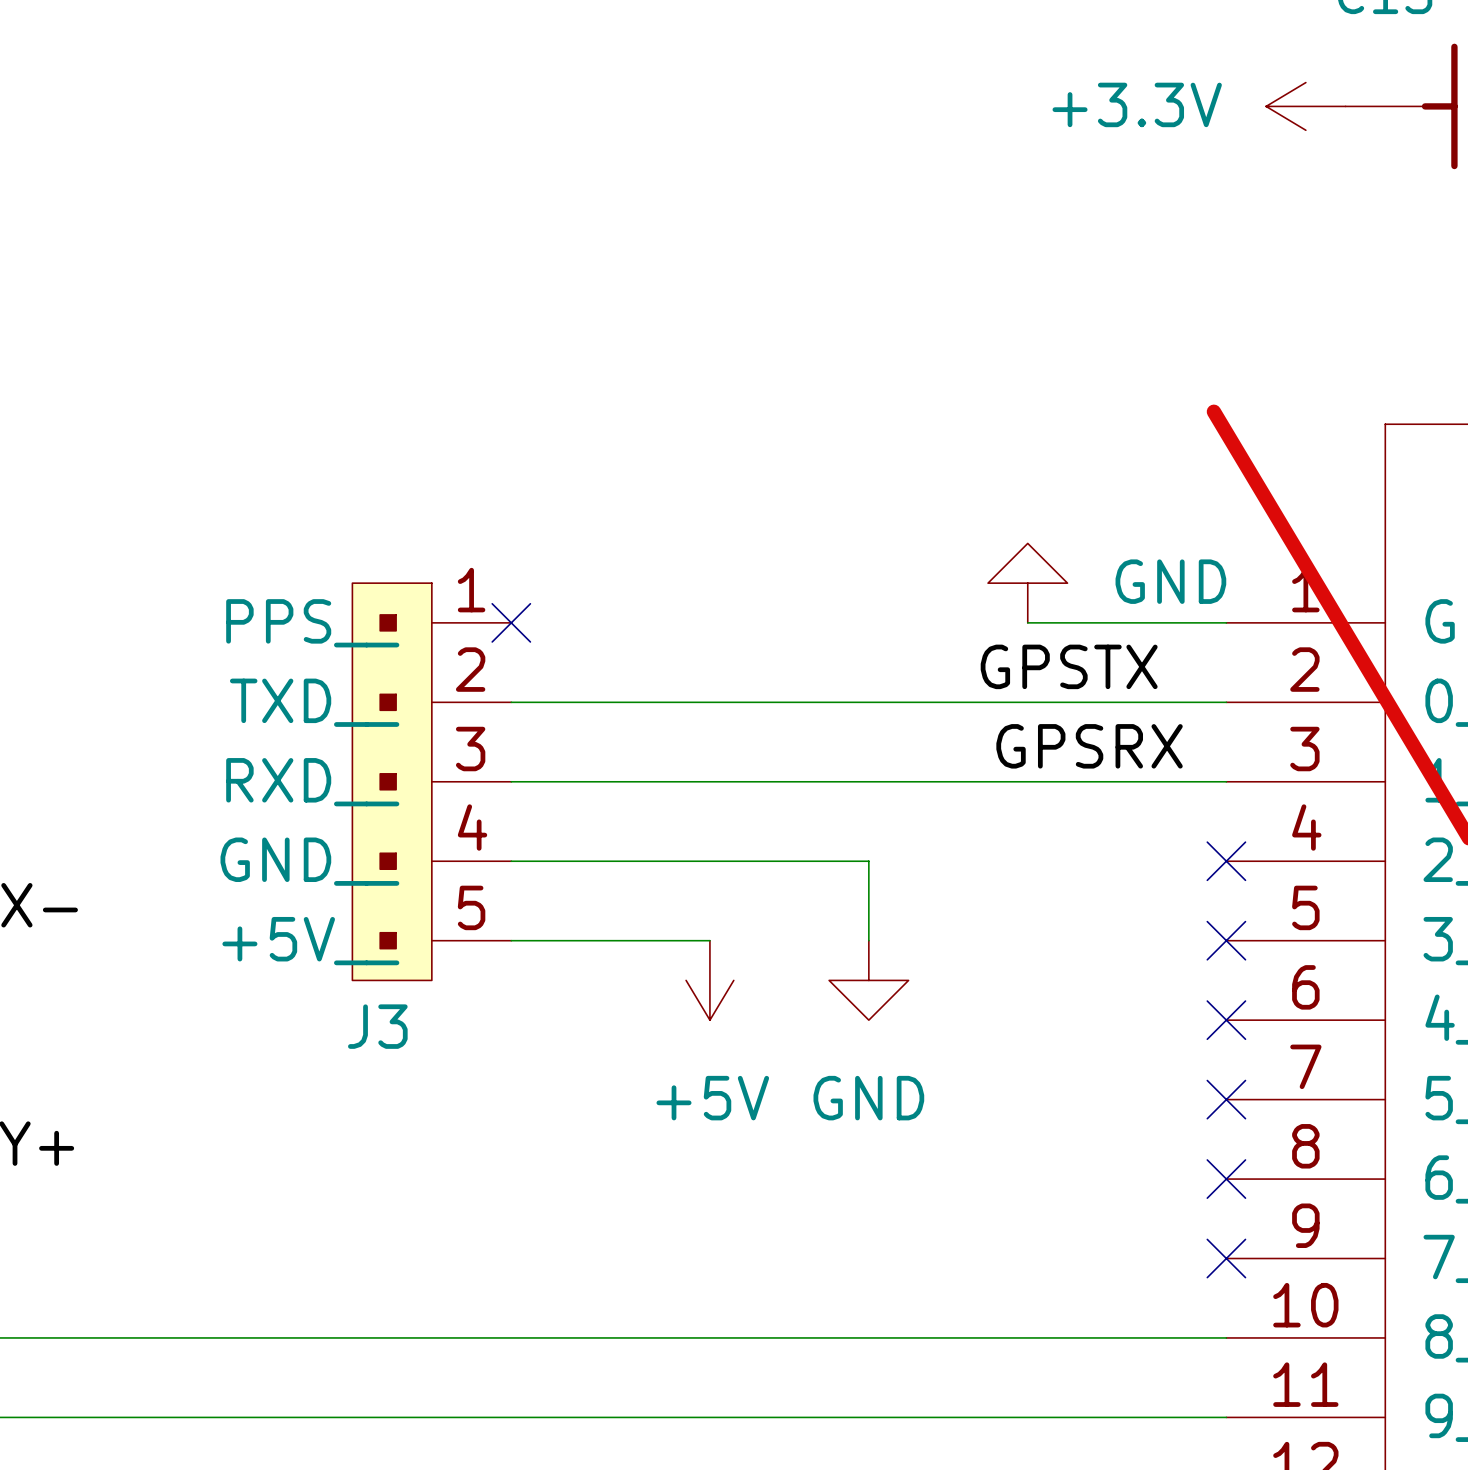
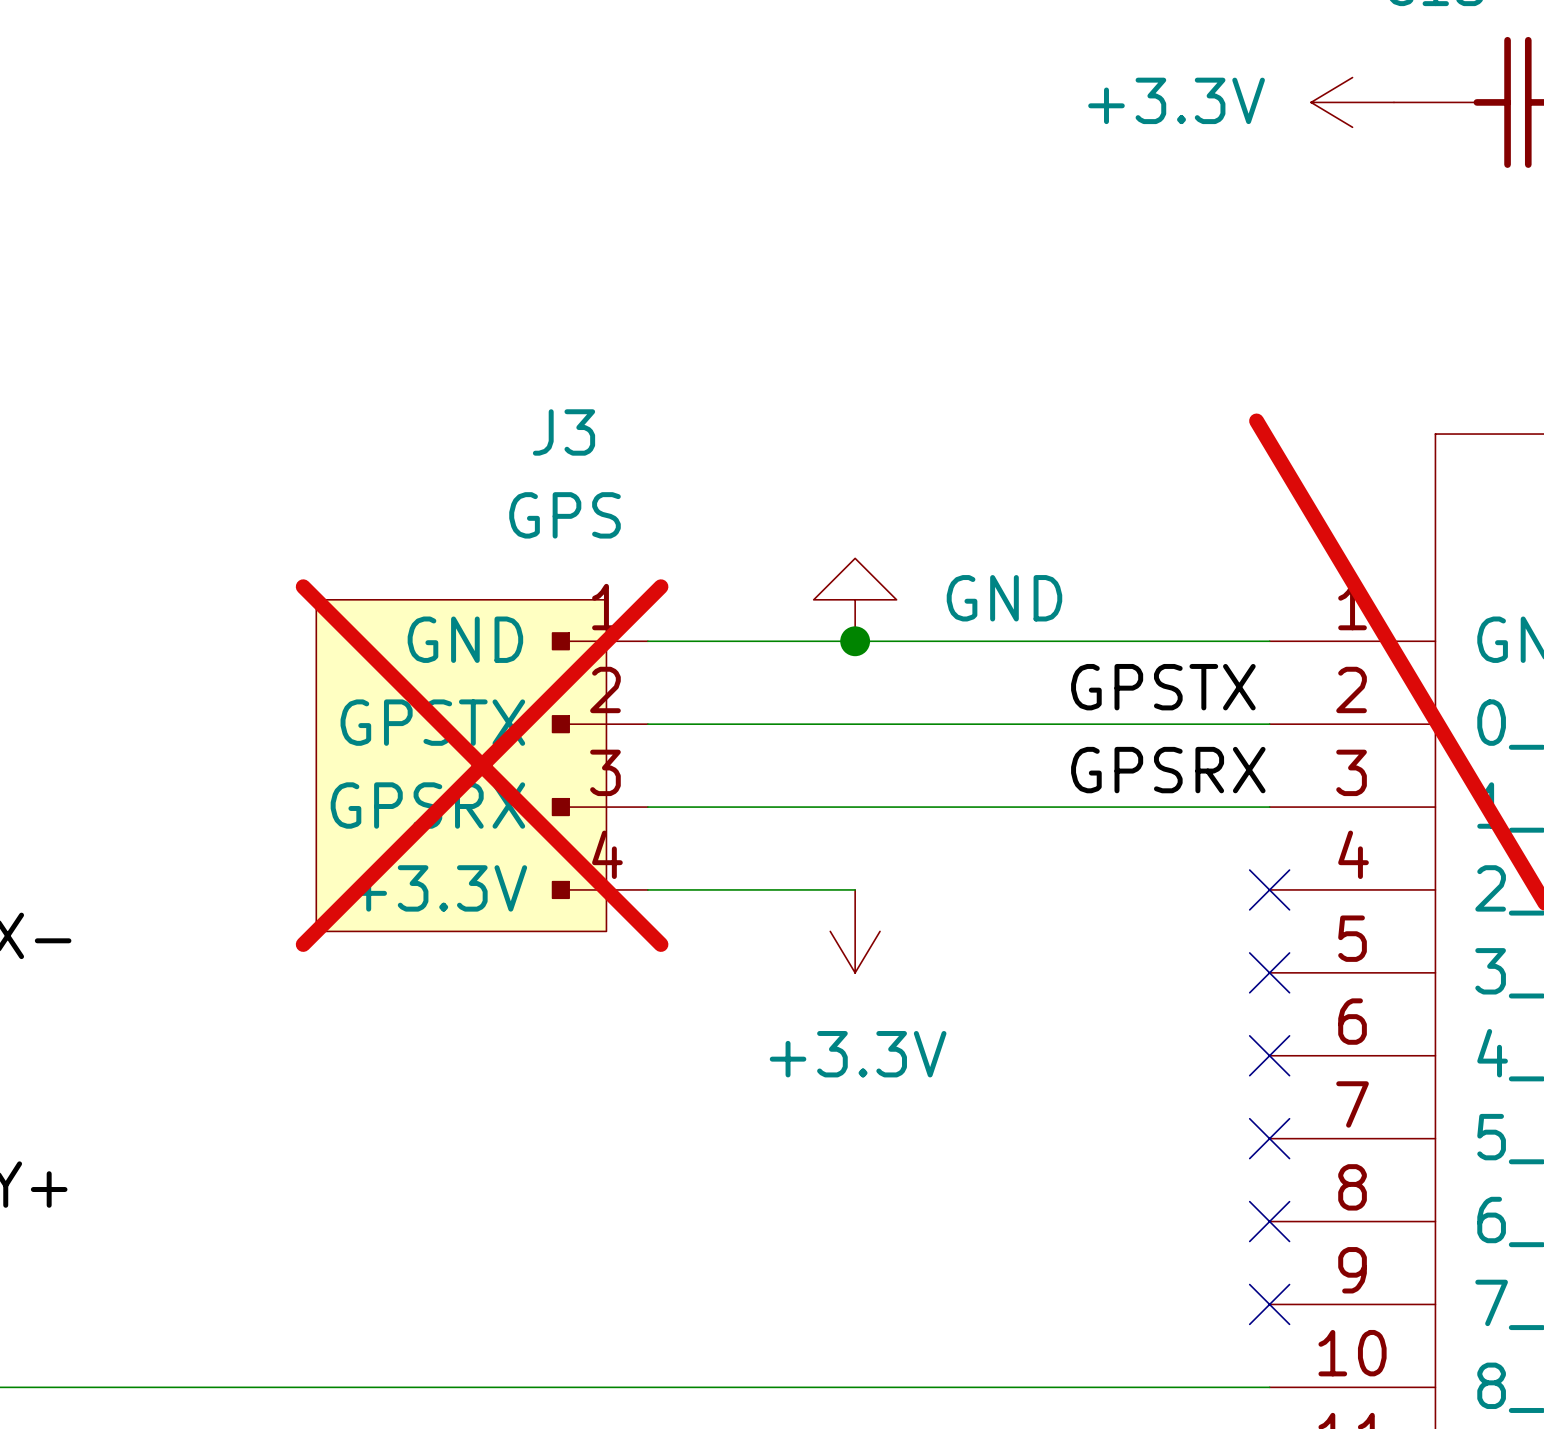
J3 value: none -> GPS (565, 515)
J3 symbol: [352, 583, 512, 981] -> [316, 599, 648, 932]
power symbol position: GND (1027, 583) -> GND (855, 599)
no-connect mark: (511, 622) -> none
wire: none -> (647, 641) (1062, 641)
junction: none -> (855, 641)
label position: GPSTX (1069, 666) -> GPSTX (1163, 687)
J3 do-not-place cross: none -> (482, 765)
label position: GPSRX (1089, 746) -> GPSRX (1168, 770)
wire: (829, 861) (868, 861) (868, 940) -> none
power symbol: none -> +3.3V (855, 931)
wire: (511, 940) (709, 940) -> none
power symbol: +5V (709, 980) -> none
power symbol: GND (868, 980) -> none
J3 name position: J3 (377, 1026) -> J3 (564, 432)

